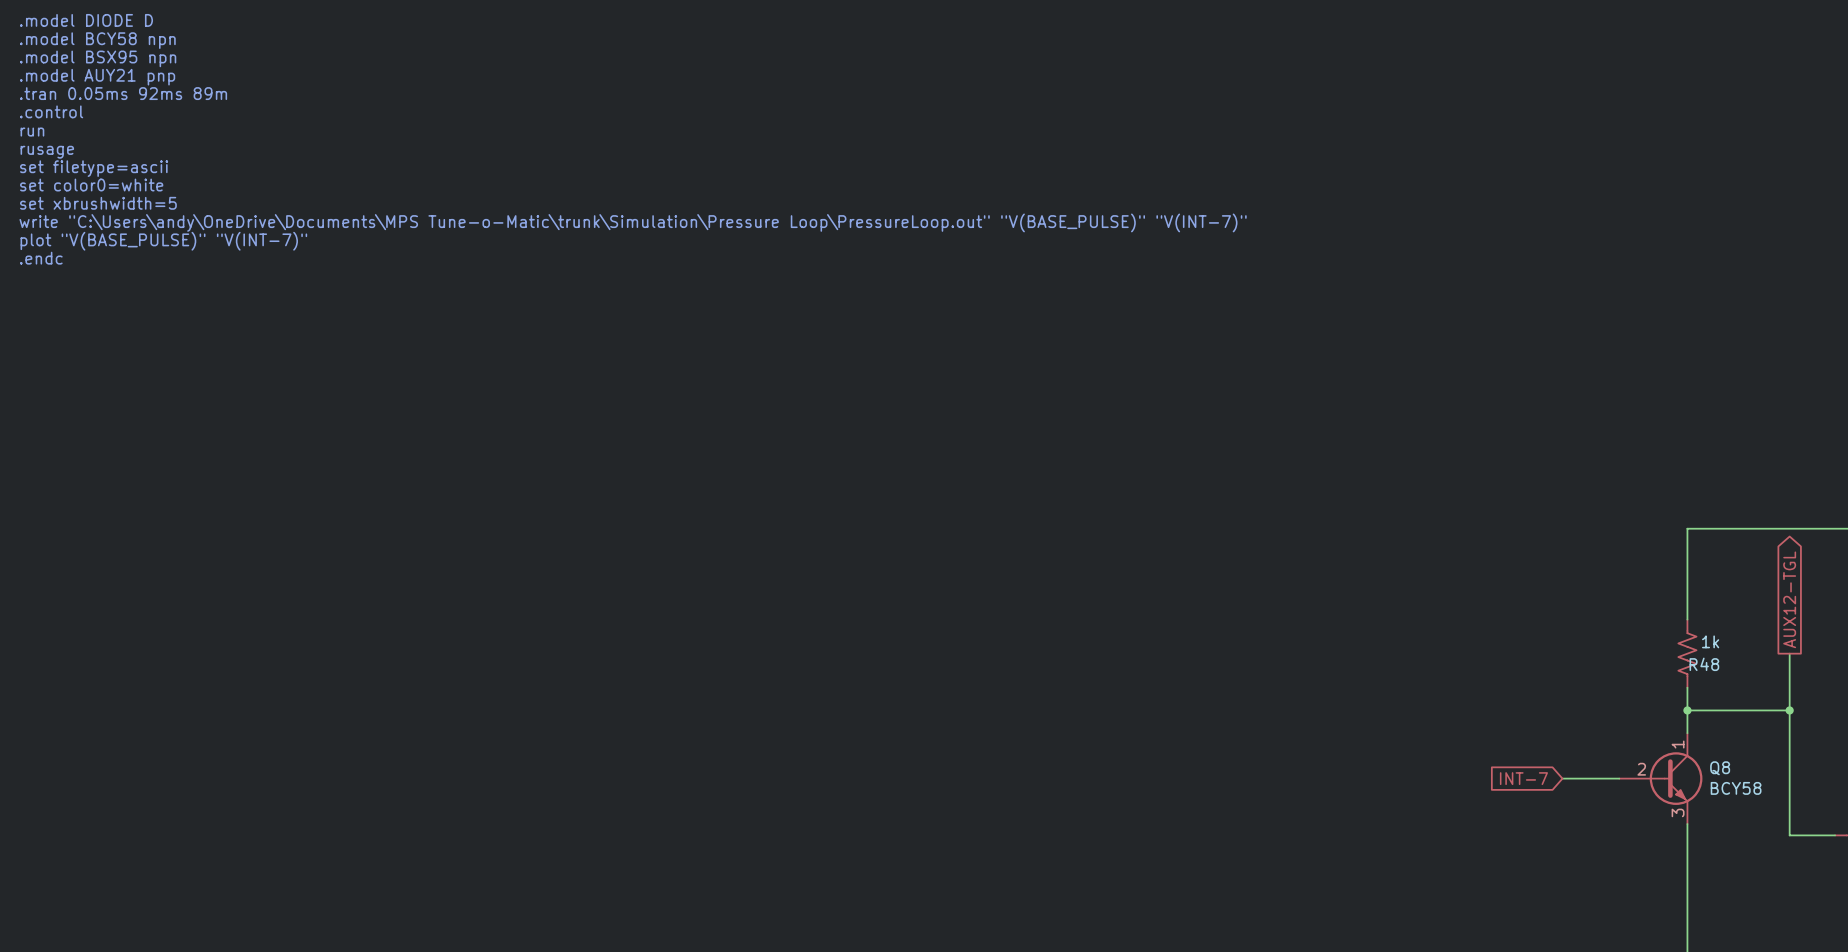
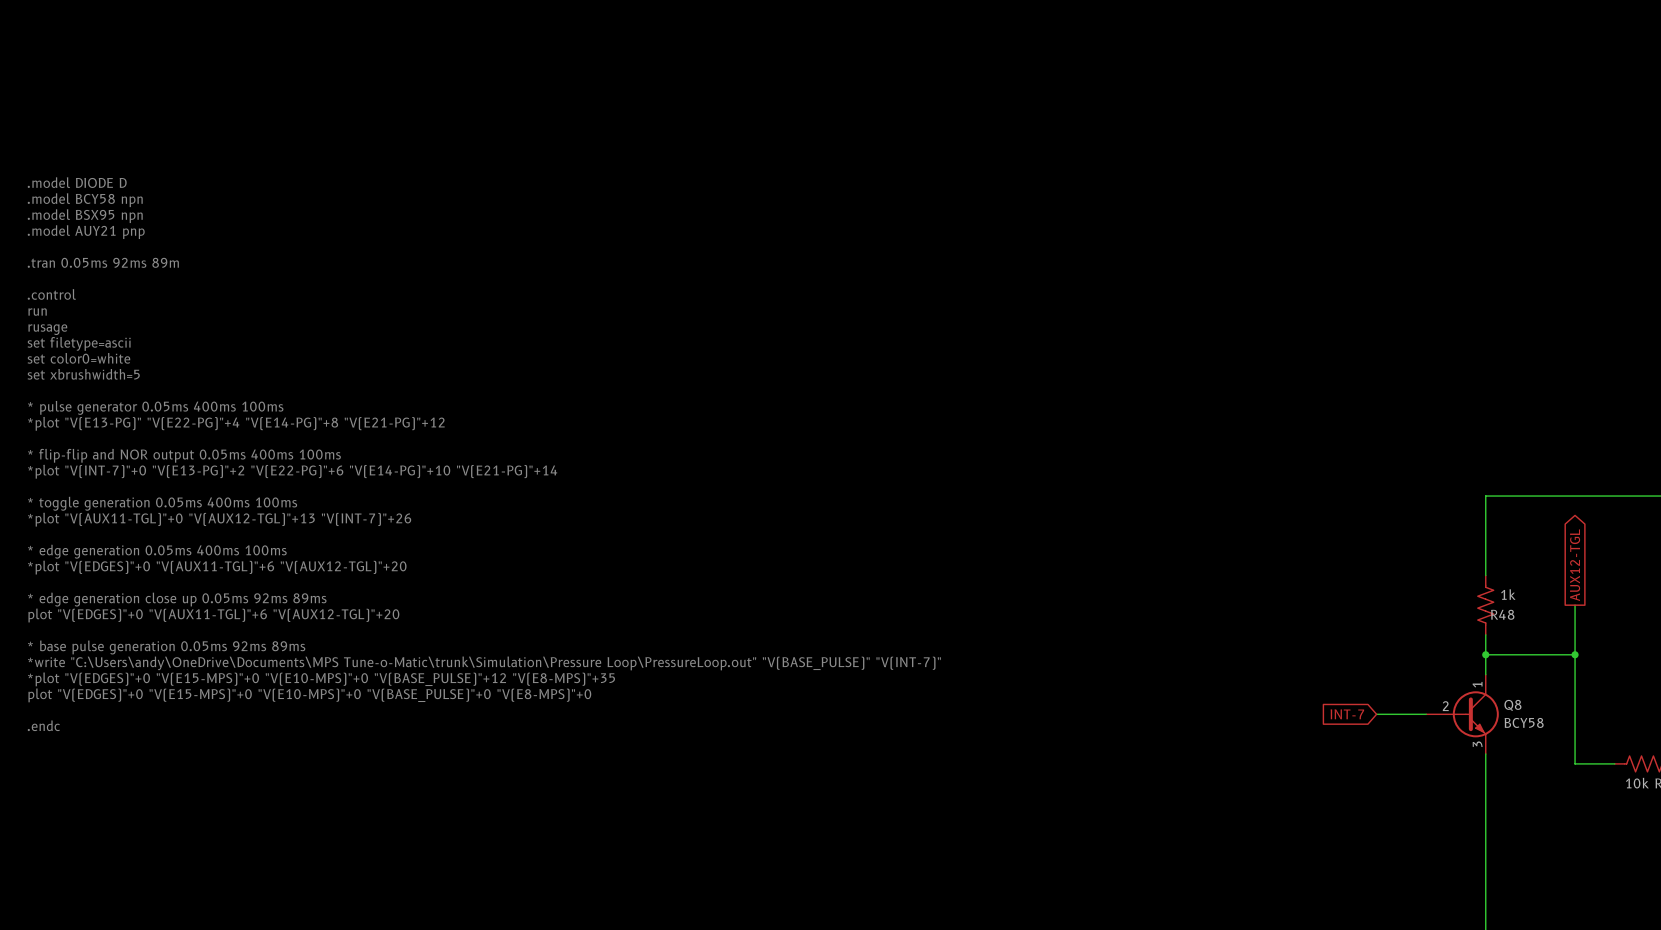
text position: .model DIODE D (86, 20) -> .model DIODE D (77, 182)
text position: .model BCY58 npn (97, 40) -> .model BCY58 npn (85, 200)
text position: .model BSX95 npn (98, 58) -> .model BSX95 npn (85, 216)
text position: .model AUY21 pnp (97, 77) -> .model AUY21 pnp (86, 232)
text position: .tran 0.05ms 92ms 89m (123, 93) -> .tran 0.05ms 92ms 89m (103, 262)
text position: .control (51, 111) -> .control (51, 294)
text position: run (32, 132) -> run (37, 312)
text position: rusage (47, 152) -> rusage (47, 329)
text position: set filetype=ascii (94, 168) -> set filetype=ascii (79, 343)
text position: set color0=white (91, 185) -> set color0=white (78, 358)
text position: set xbrushwidth=5 (98, 203) -> set xbrushwidth=5 (83, 374)
text: write "C:\Users\andy\OneDrive\Documents\MPS Tune-o-Matic\trunk\Simulation\Pressure Loop\PressureLoop.out" "V(BASE_PULSE)" "V(INT-7)" (633, 222) -> none
text: plot "V(BASE_PULSE)" "V(INT-7)" (163, 241) -> none
text: .endc (41, 258) -> none
text: none -> * pulse generator 0.05ms 400ms 100ms (155, 407)
text: none -> *plot "V(E13-PG)" "V(E22-PG)"+4 "V(E14-PG)"+8 "V(E21-PG)"+12 (236, 423)
text: none -> * flip-flip and NOR output 0.05ms 400ms 100ms (184, 455)
text: none -> *plot "V(INT-7)"+0 "V(E13-PG)"+2 "V(E22-PG)"+6 "V(E14-PG)"+10 "V(E21-PG)"+14 (292, 471)
text: none -> * toggle generation 0.05ms 400ms 100ms (162, 503)
text: none -> *plot "V(AUX11-TGL)"+0 "V(AUX12-TGL)"+13 "V(INT-7)"+26 (219, 519)
text: none -> * edge generation 0.05ms 400ms 100ms (157, 551)
text: none -> *plot "V(EDGES)"+0 "V(AUX11-TGL)"+6 "V(AUX12-TGL)"+20 (217, 567)
text: none -> * edge generation close up 0.05ms 92ms 89ms (177, 599)
text: none -> plot "V(EDGES)"+0 "V(AUX11-TGL)"+6 "V(AUX12-TGL)"+20 (213, 615)
text: none -> * base pulse generation 0.05ms 92ms 89ms (166, 647)
text: none -> *write "C:\Users\andy\OneDrive\Documents\MPS Tune-o-Matic\trunk\Simulation\Pressure Loop\PressureLoop.out" "V(BASE_PULSE)" "V(INT-7)" (484, 663)
text: none -> *plot "V(EDGES)"+0 "V(E15-MPS)"+0 "V(E10-MPS)"+0 "V(BASE_PULSE)"+12 "V(E8-MPS)"+35 (321, 679)
text: none -> plot "V(EDGES)"+0 "V(E15-MPS)"+0 "V(E10-MPS)"+0 "V(BASE_PULSE)"+0 "V(E8-MPS)"+0 (309, 695)
text: none -> .endc (43, 725)

